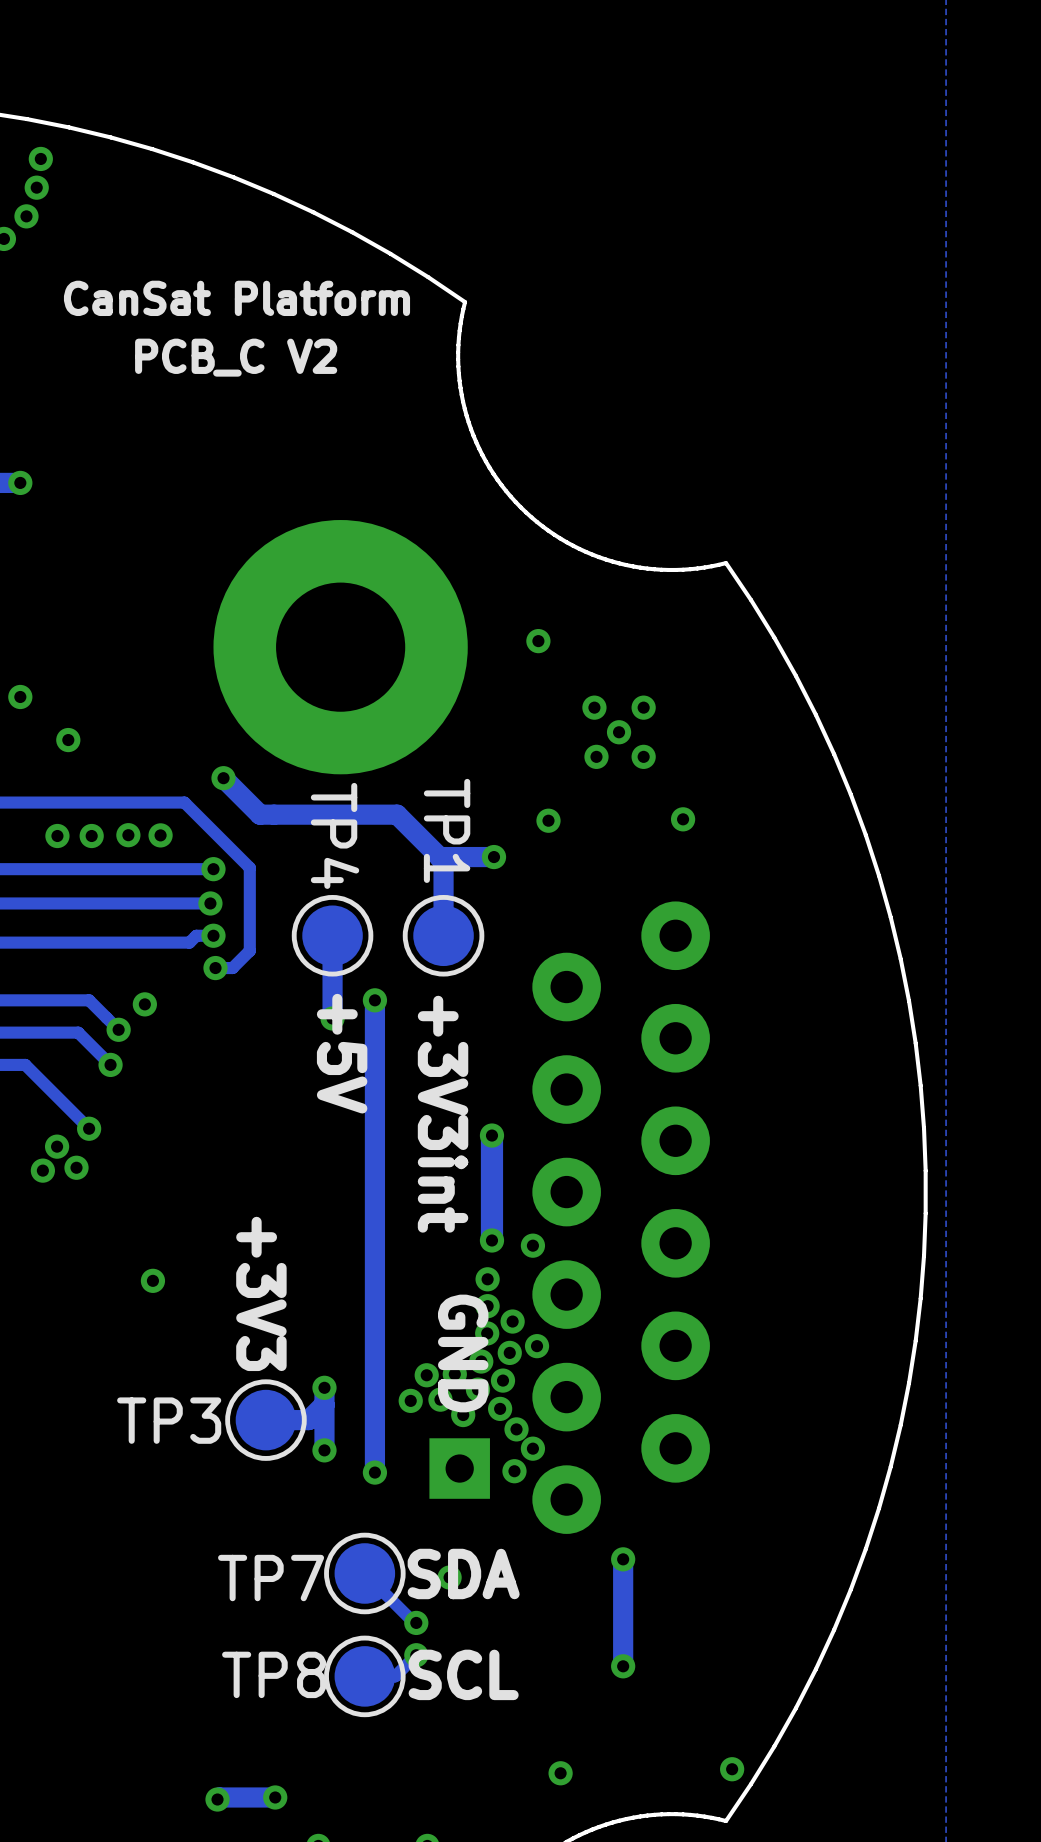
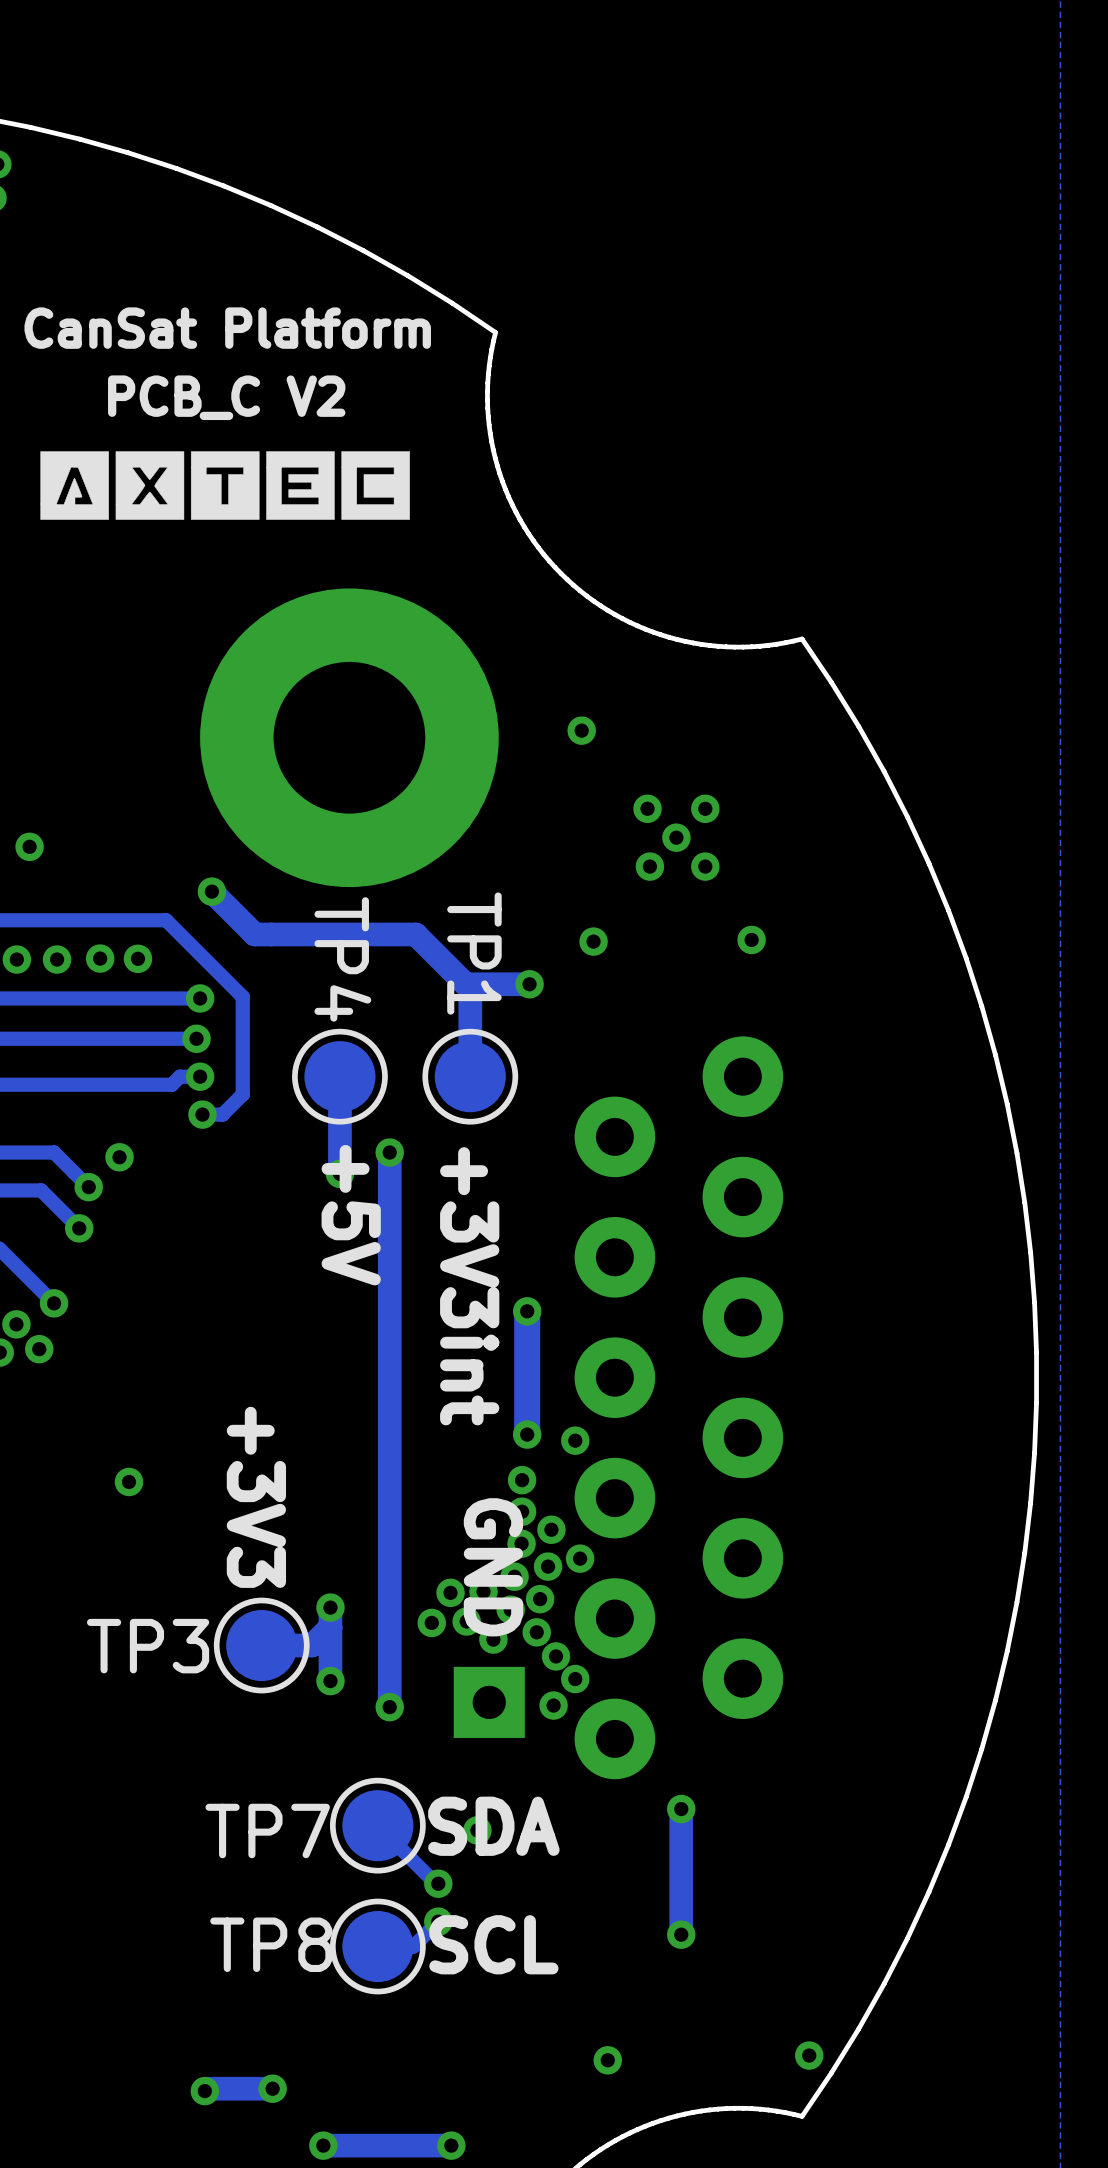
drawing: none -> [40, 451, 410, 520]

